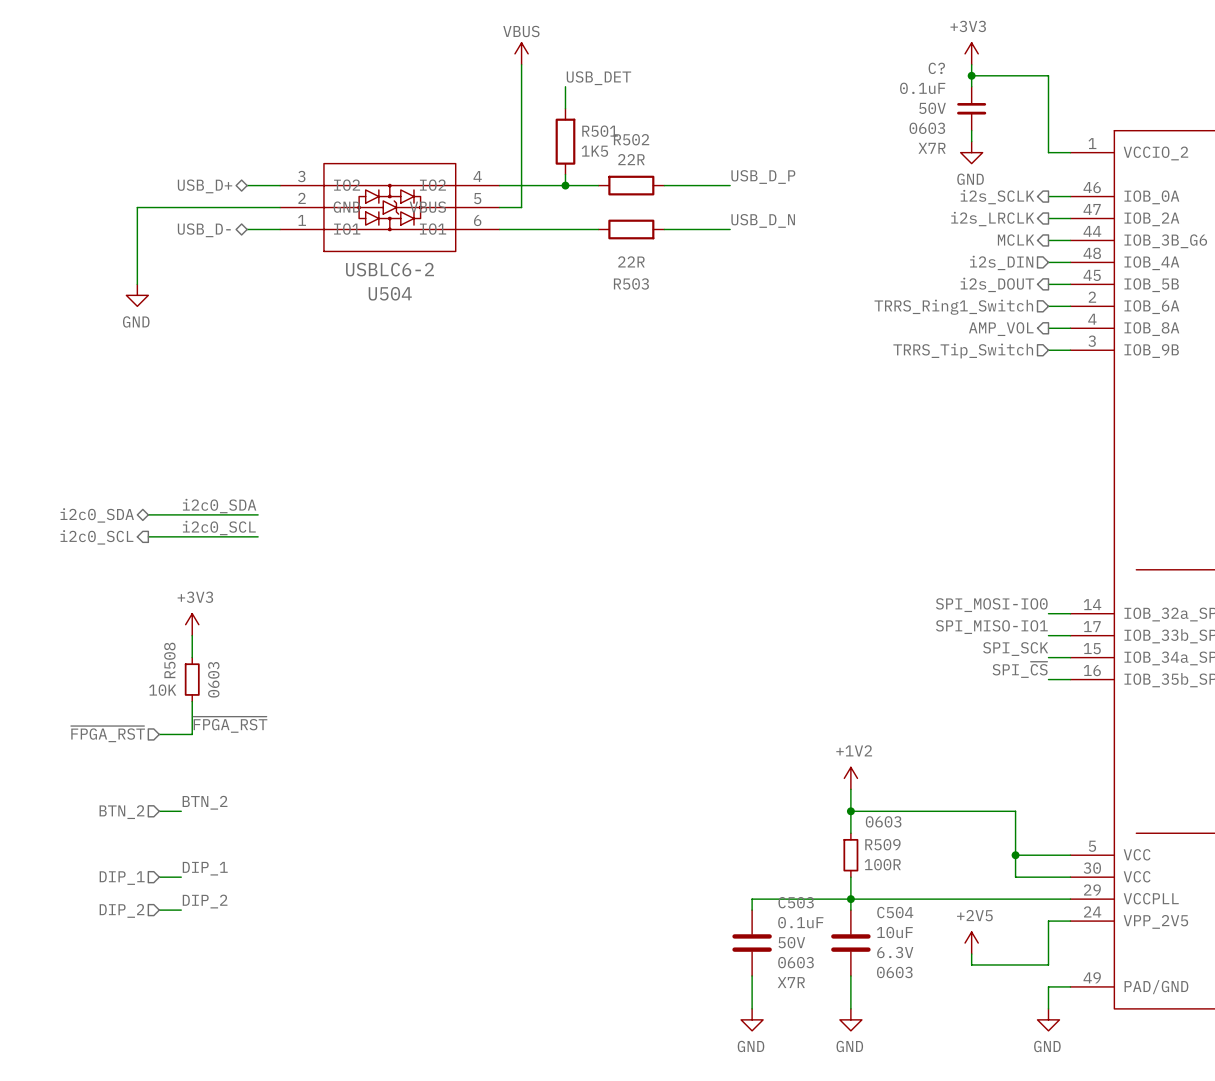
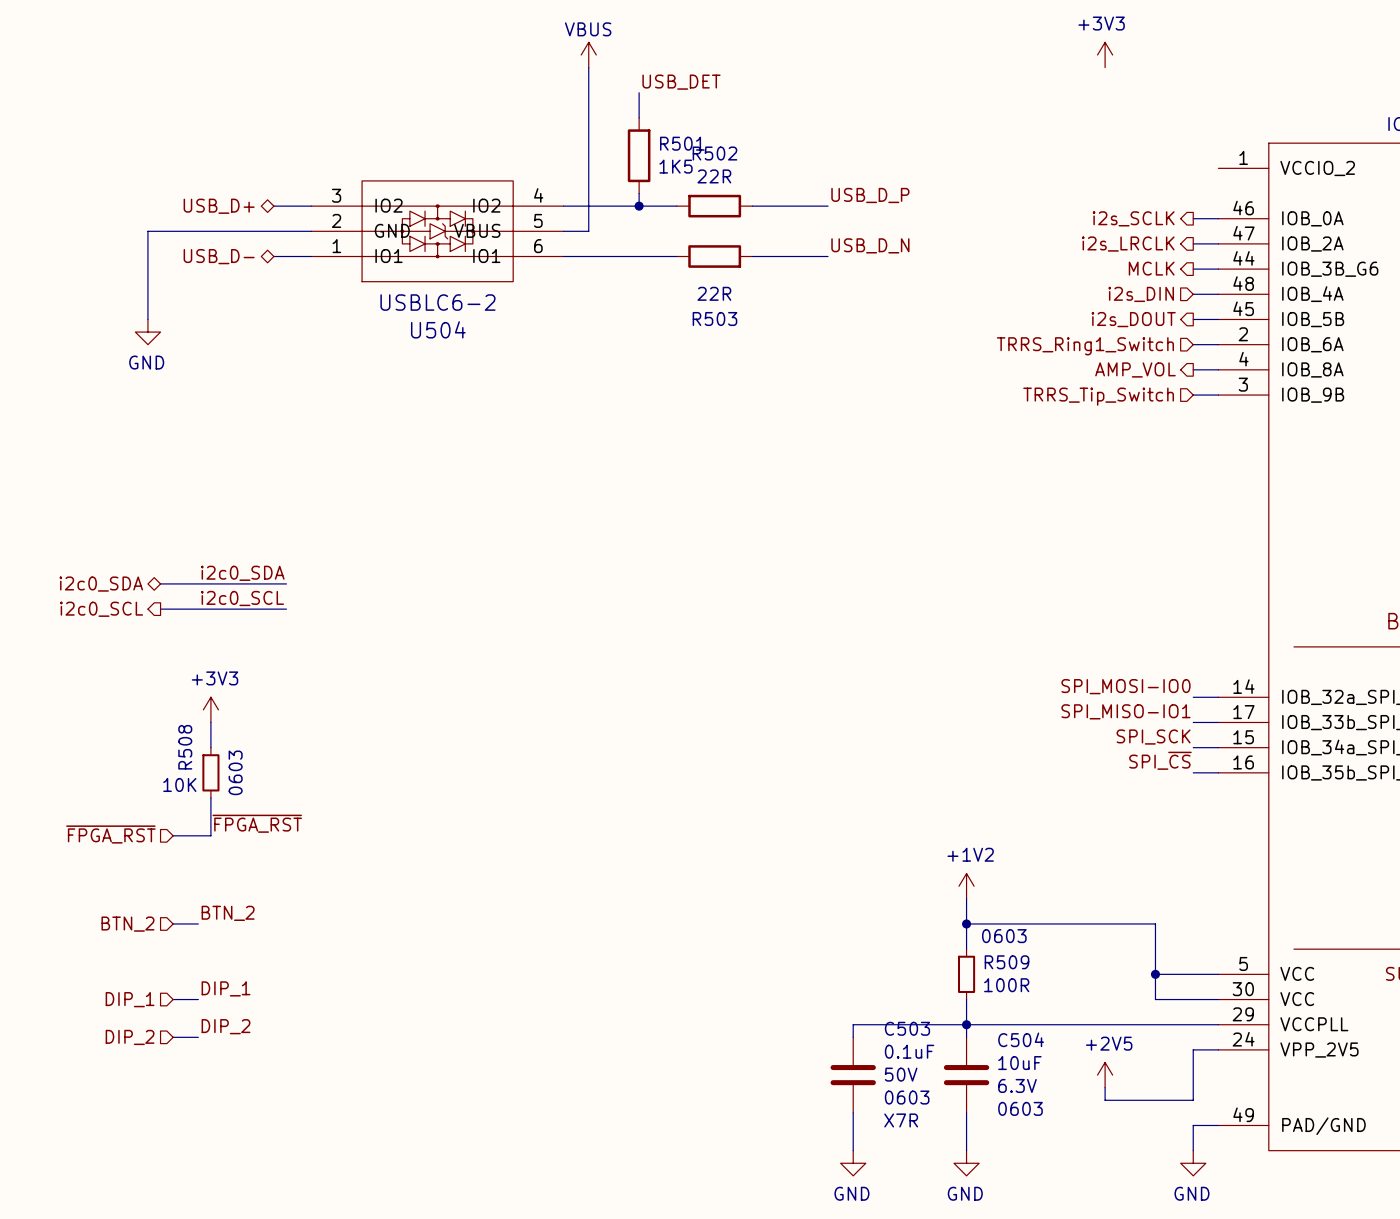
wire: (971, 64) (971, 86) -> none
wire: (971, 75) (1048, 75) (1048, 152) (1070, 152) -> none
junction: (971, 75) -> none
C?: 0.1uF (971, 108) -> none
wire: (971, 130) (971, 141) -> none
power symbol: GND (971, 152) -> none

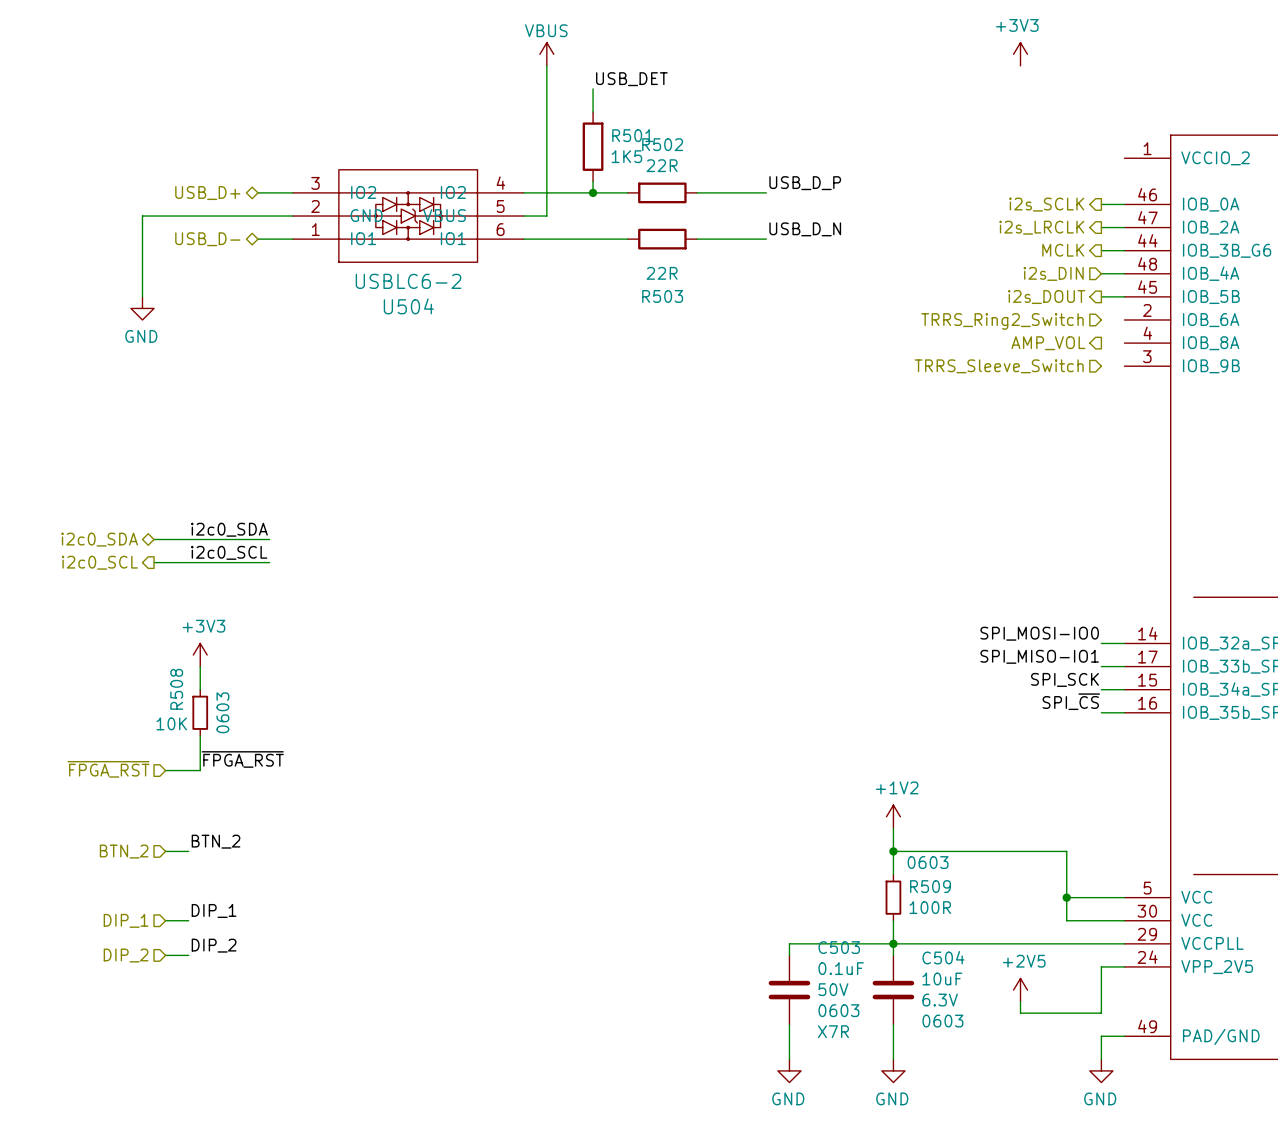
wire: (1193, 344) (1218, 344) -> none
hierarchical label: TRRS_Ring1_Switch (1085, 346) -> TRRS_Ring2_Switch (1002, 321)
wire: (1193, 369) (1218, 369) -> none
wire: (1193, 395) (1218, 395) -> none
hierarchical label: TRRS_Tip_Switch (1098, 396) -> TRRS_Sleeve_Switch (999, 366)

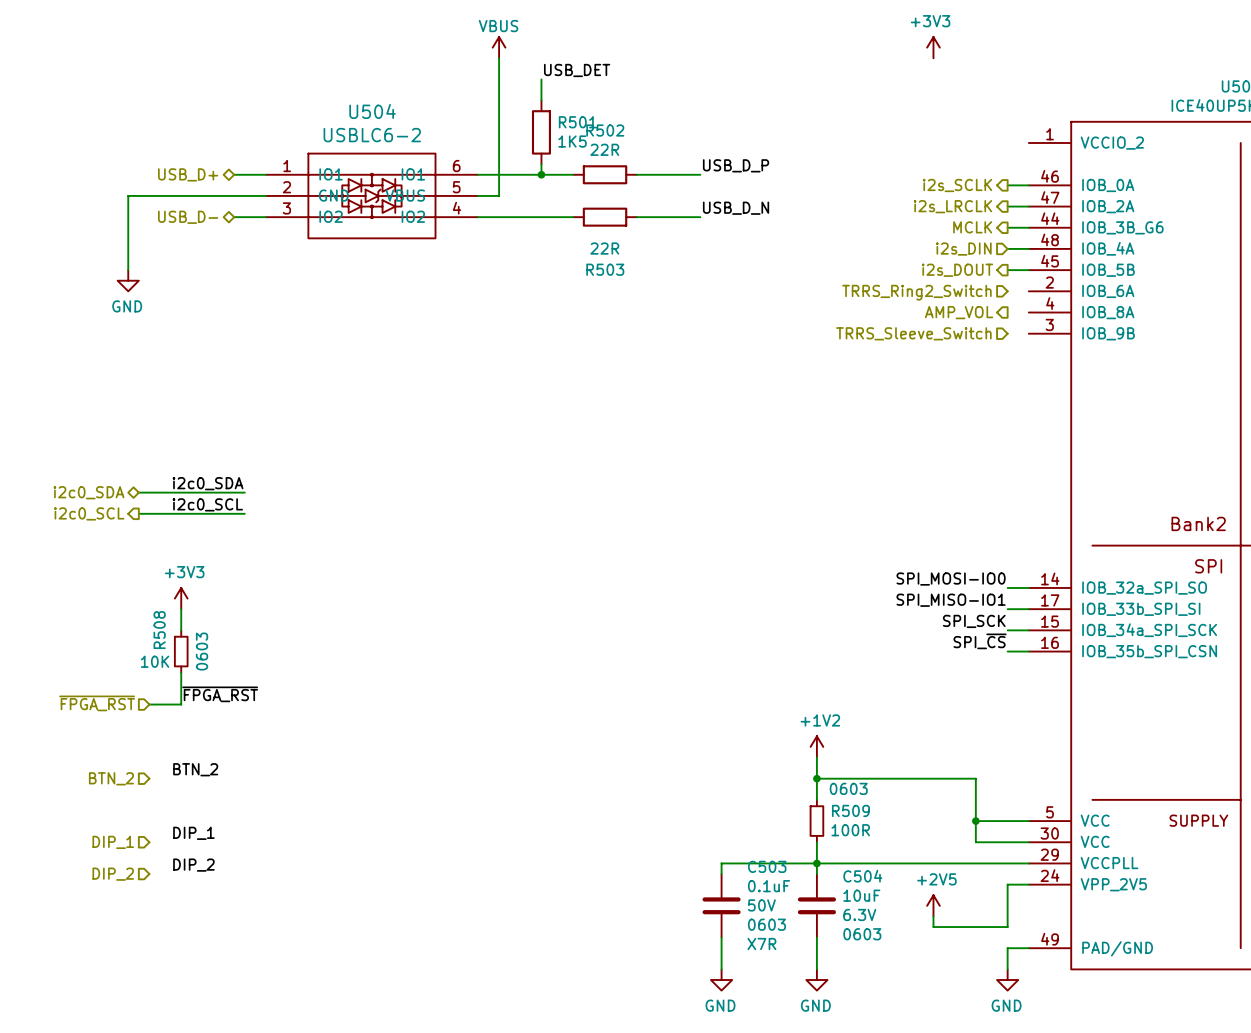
U504 flip: as is (408, 216) -> up-down (371, 195)
wire: (165, 851) (188, 851) -> none
wire: (165, 920) (188, 920) -> none
wire: (165, 955) (188, 955) -> none

